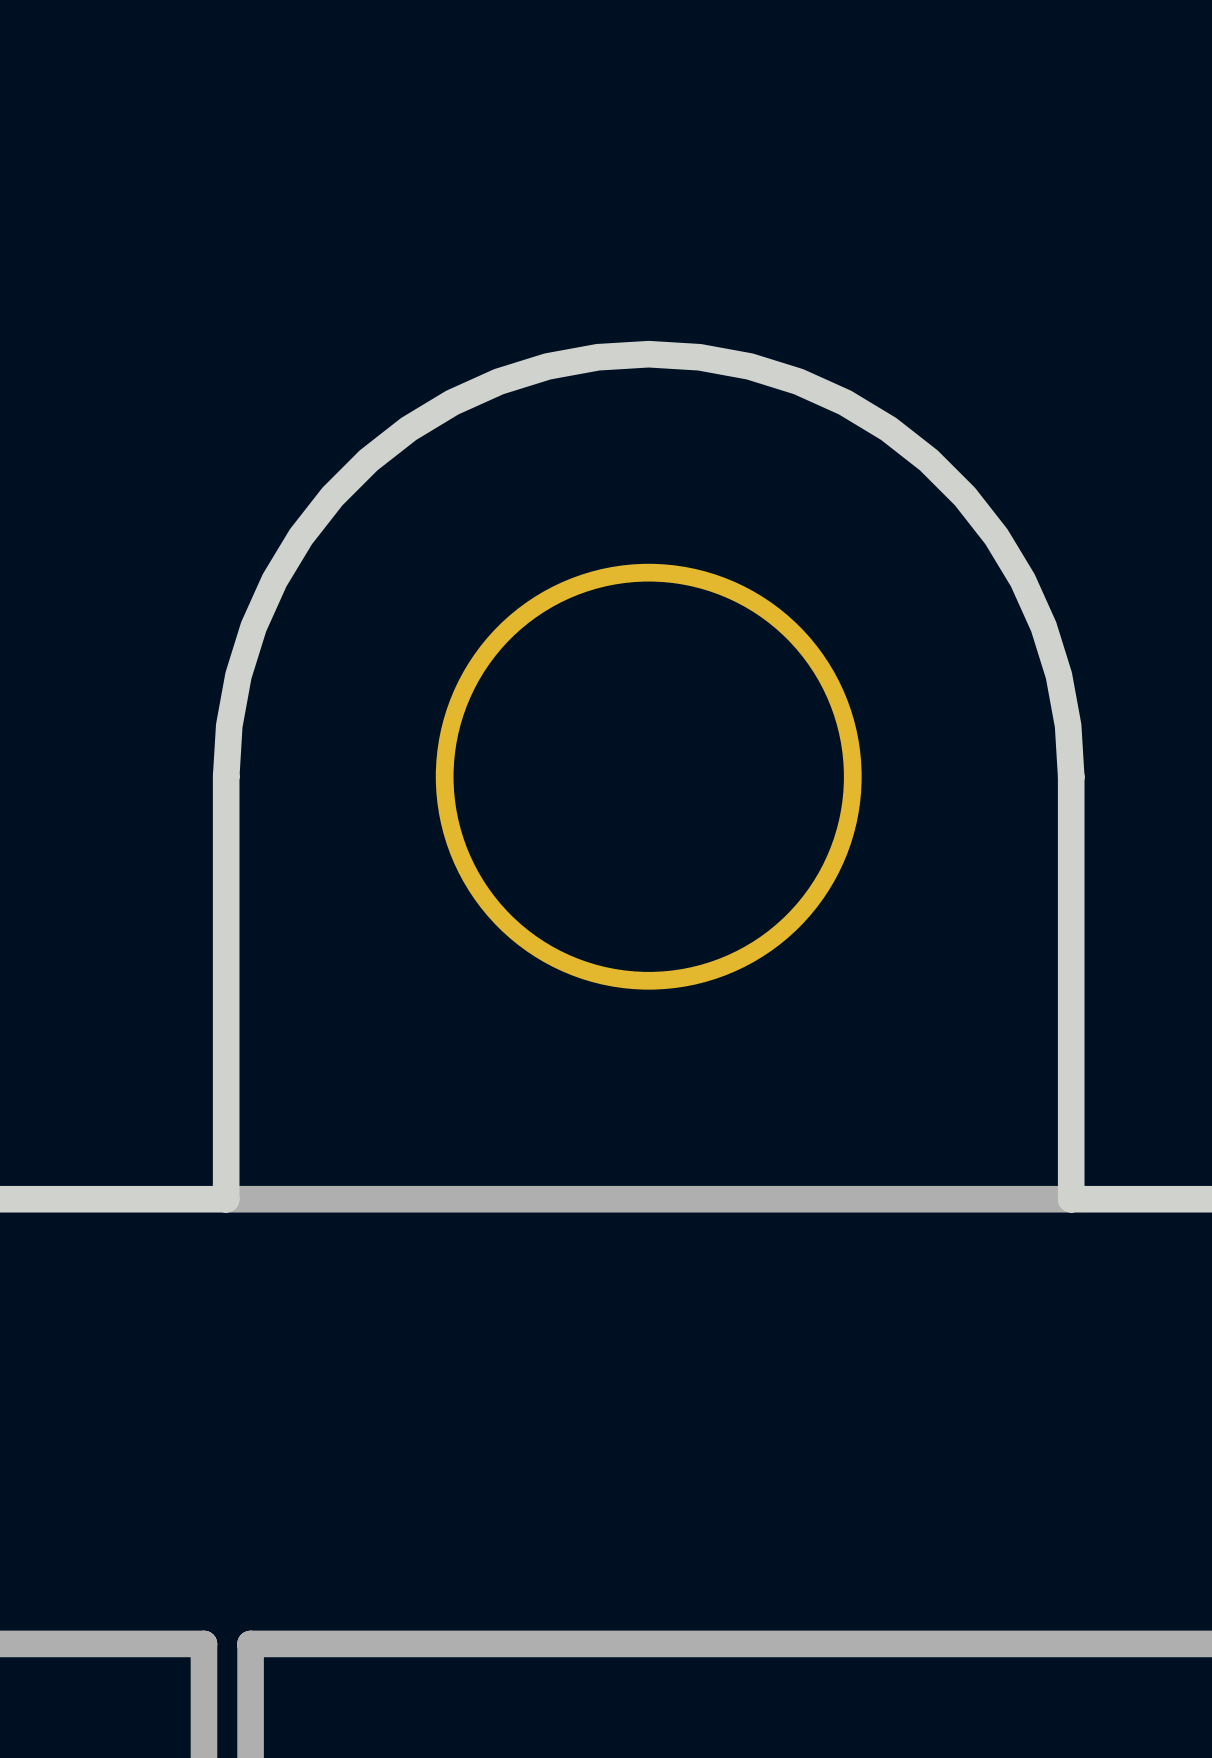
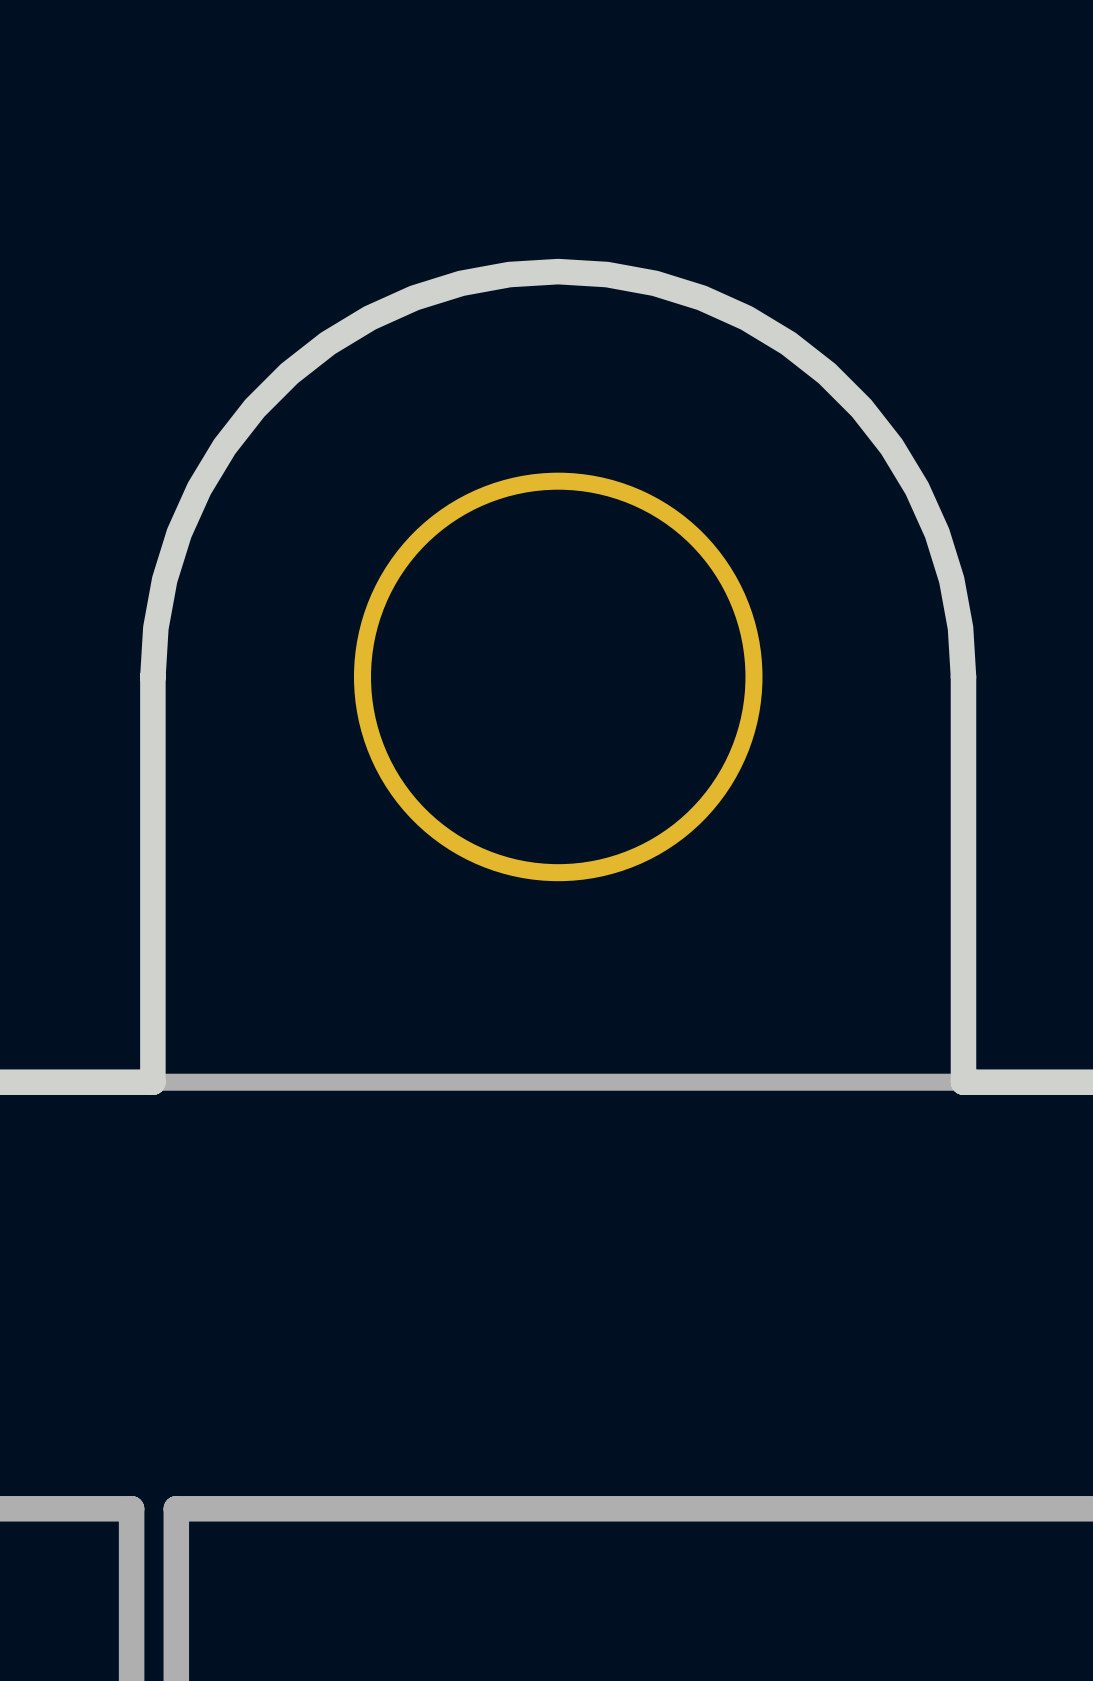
line width: thick (226, 1199) (1071, 1199) -> thin (152, 1082) (963, 1082)

